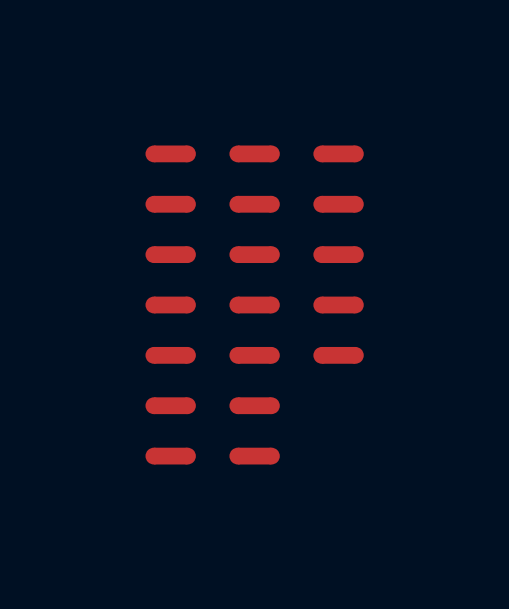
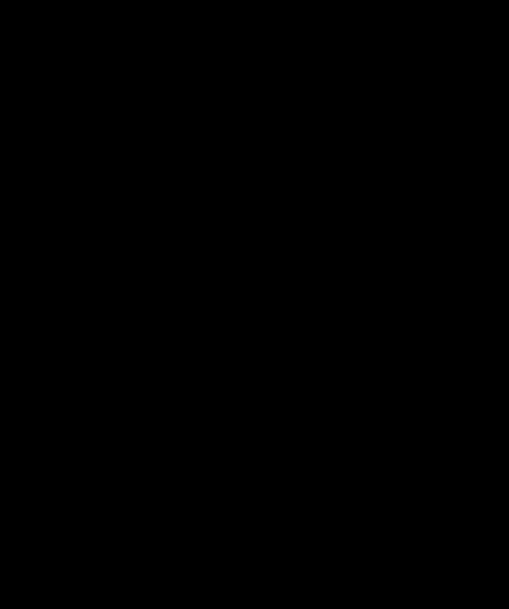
part: (170, 153) -> none
part: (254, 153) -> none
part: (338, 153) -> none
part: (170, 204) -> none
part: (254, 204) -> none
part: (338, 204) -> none
part: (170, 254) -> none
part: (254, 254) -> none
part: (338, 254) -> none
part: (170, 304) -> none
part: (254, 304) -> none
part: (338, 304) -> none
part: (170, 355) -> none
part: (254, 355) -> none
part: (338, 355) -> none
part: (170, 405) -> none
part: (254, 405) -> none
part: (170, 456) -> none
part: (254, 456) -> none

